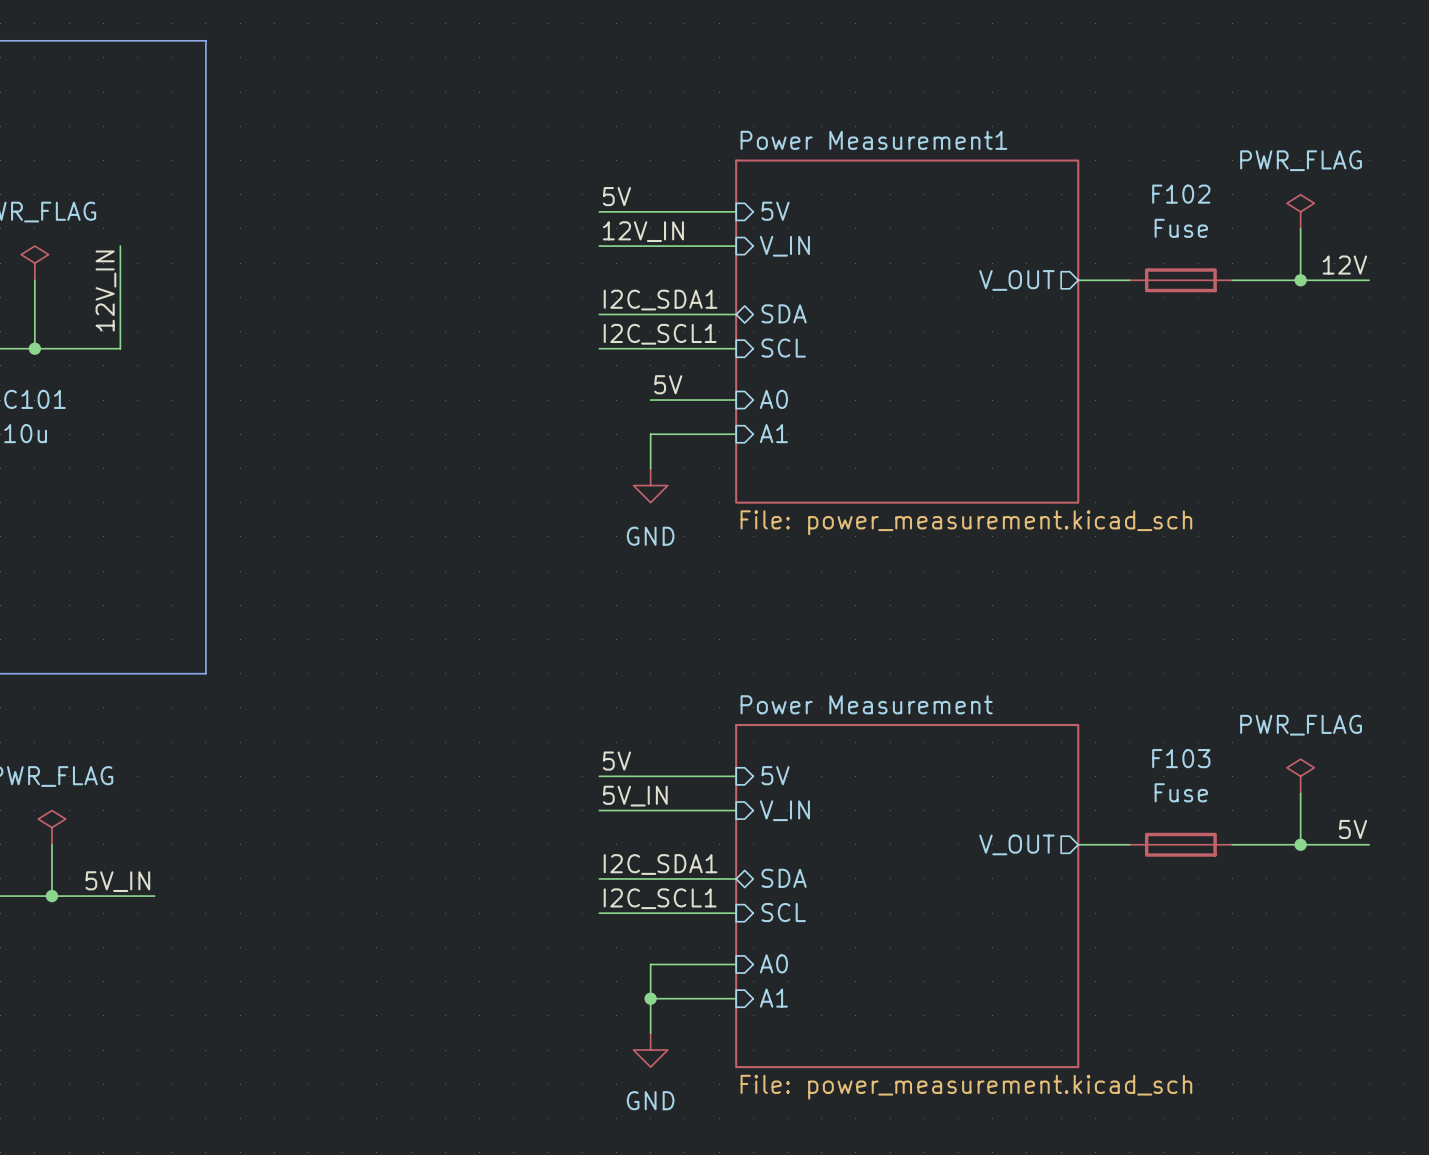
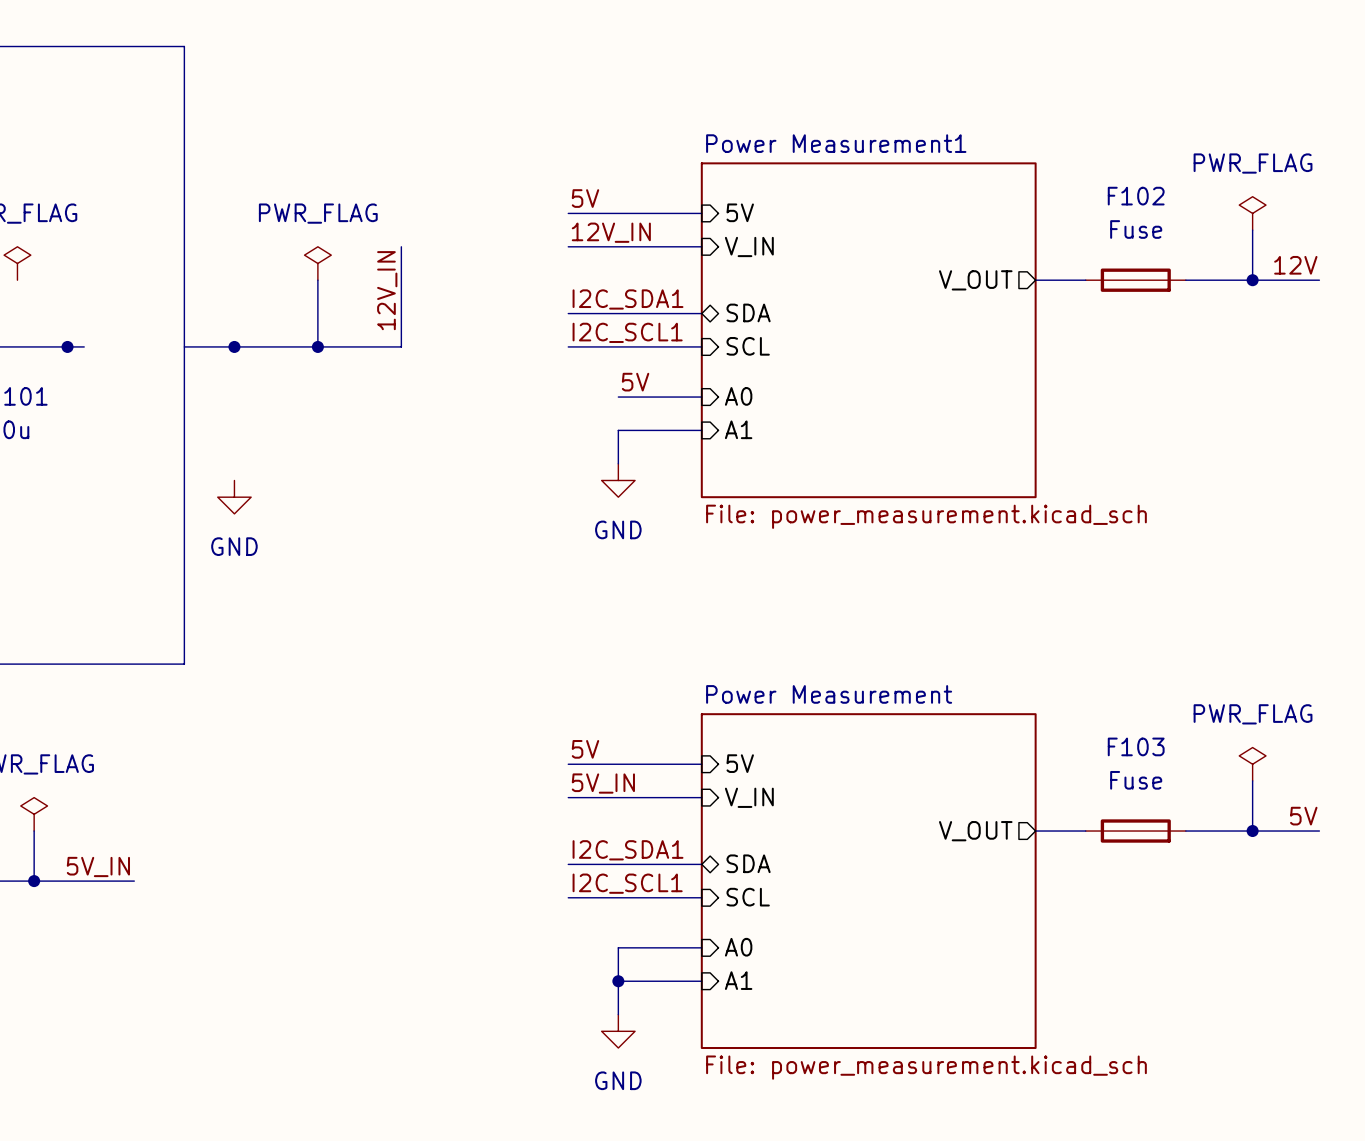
wire: (120, 246) (120, 348) (103, 348) -> none
wire: none -> (401, 246) (401, 346) (184, 346)
power symbol: none -> PWR_FLAG (317, 263)
wire: (34, 280) (34, 348) -> (317, 280) (317, 346)
label position: 12V_IN (105, 291) -> 12V_IN (387, 290)
junction position: (34, 348) -> (67, 346)
junction: none -> (234, 346)
junction: none -> (317, 346)
power symbol: none -> GND (234, 497)

